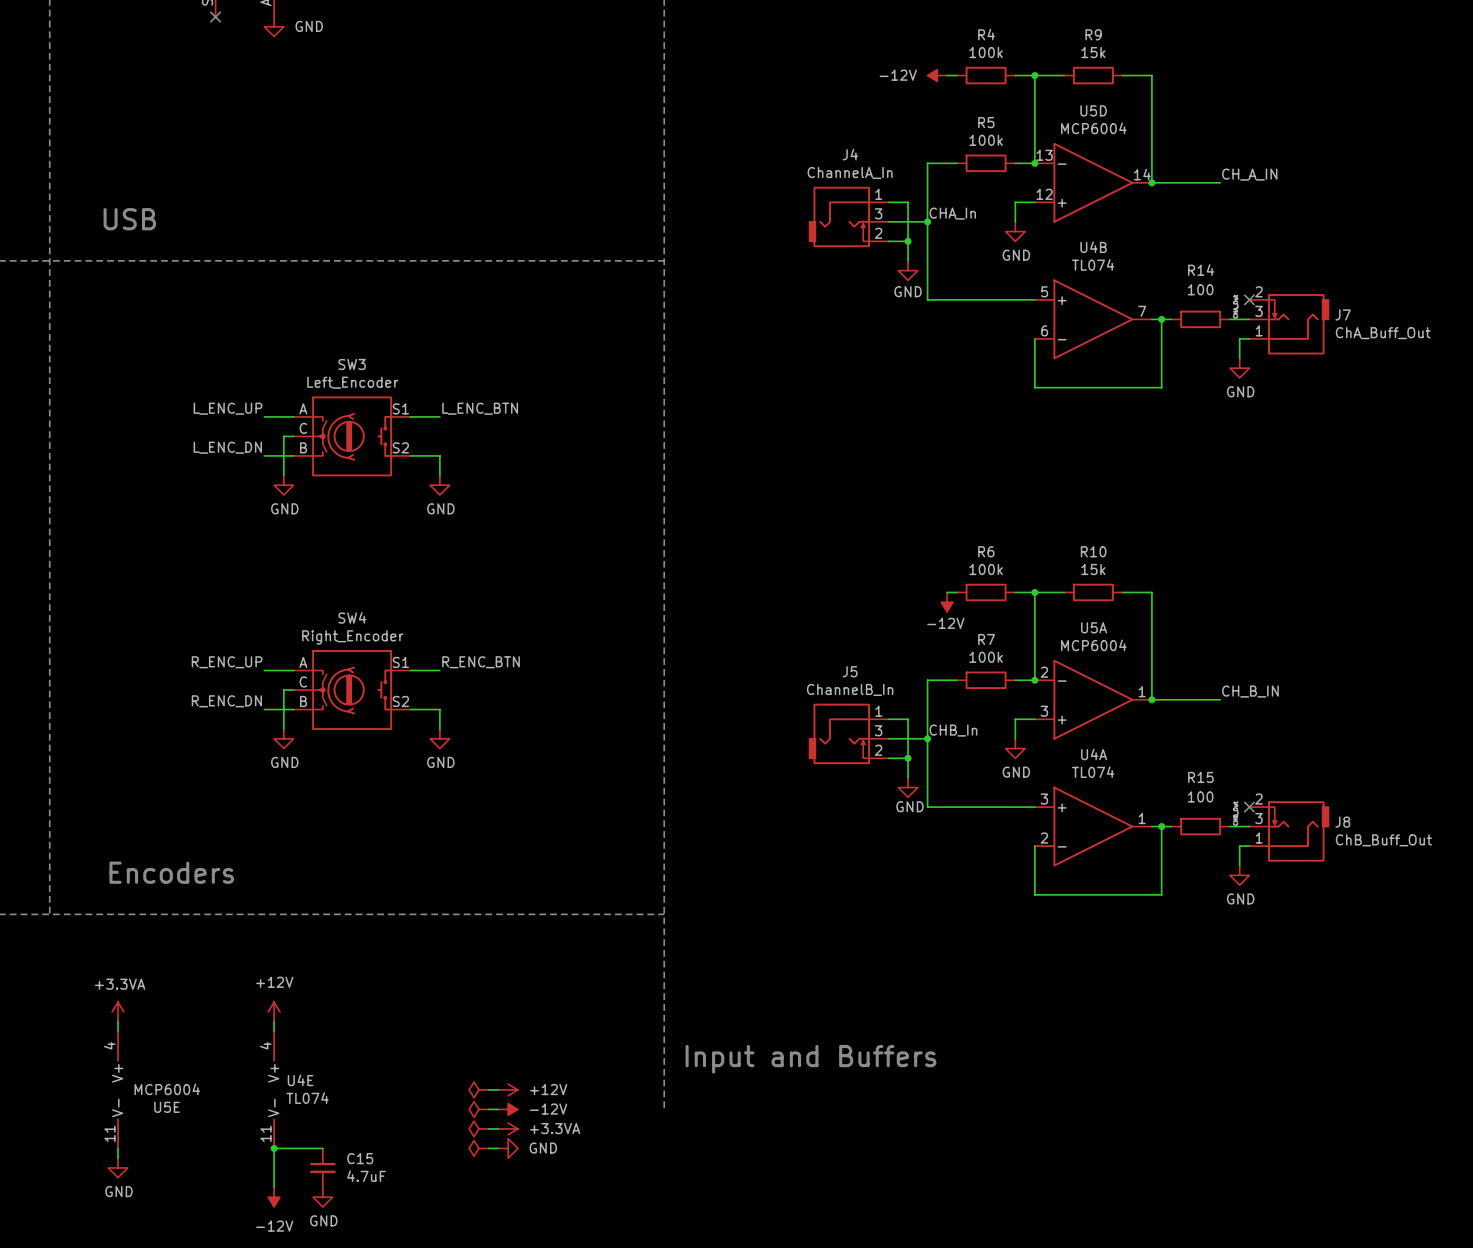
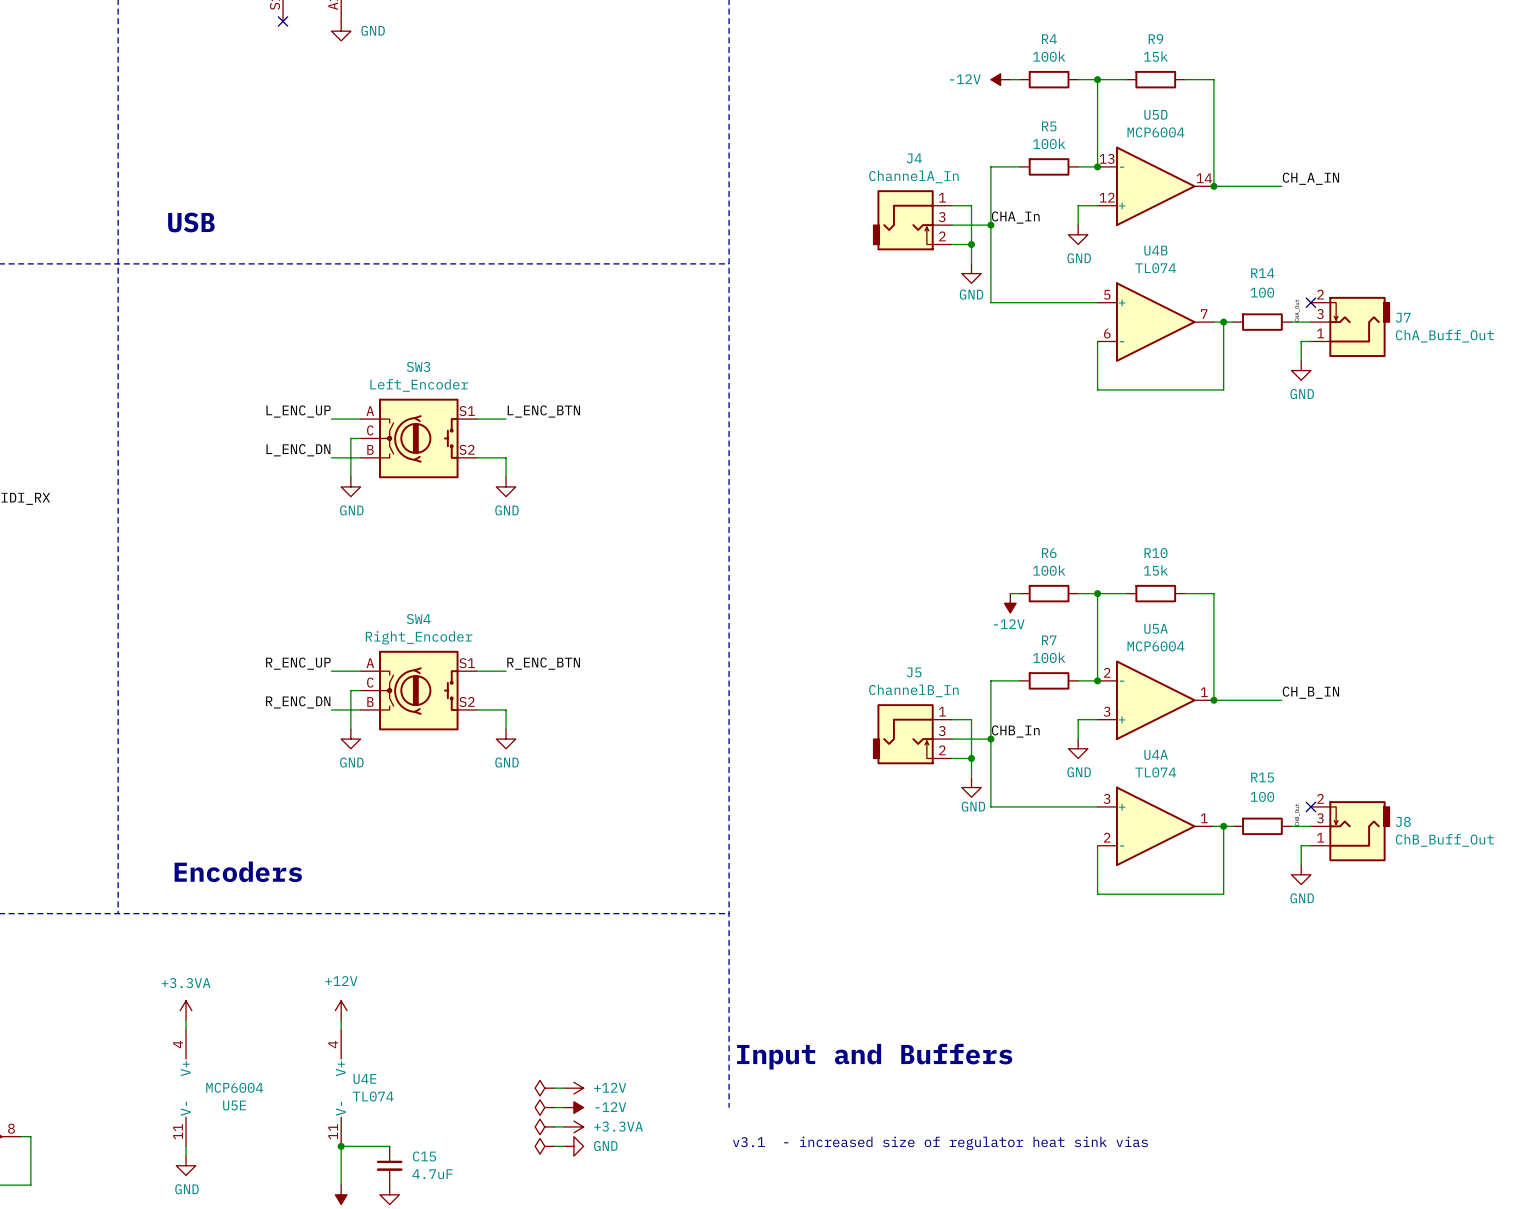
text: none -> v3.1 - increased size of regulator heat sink vias (940, 1143)

